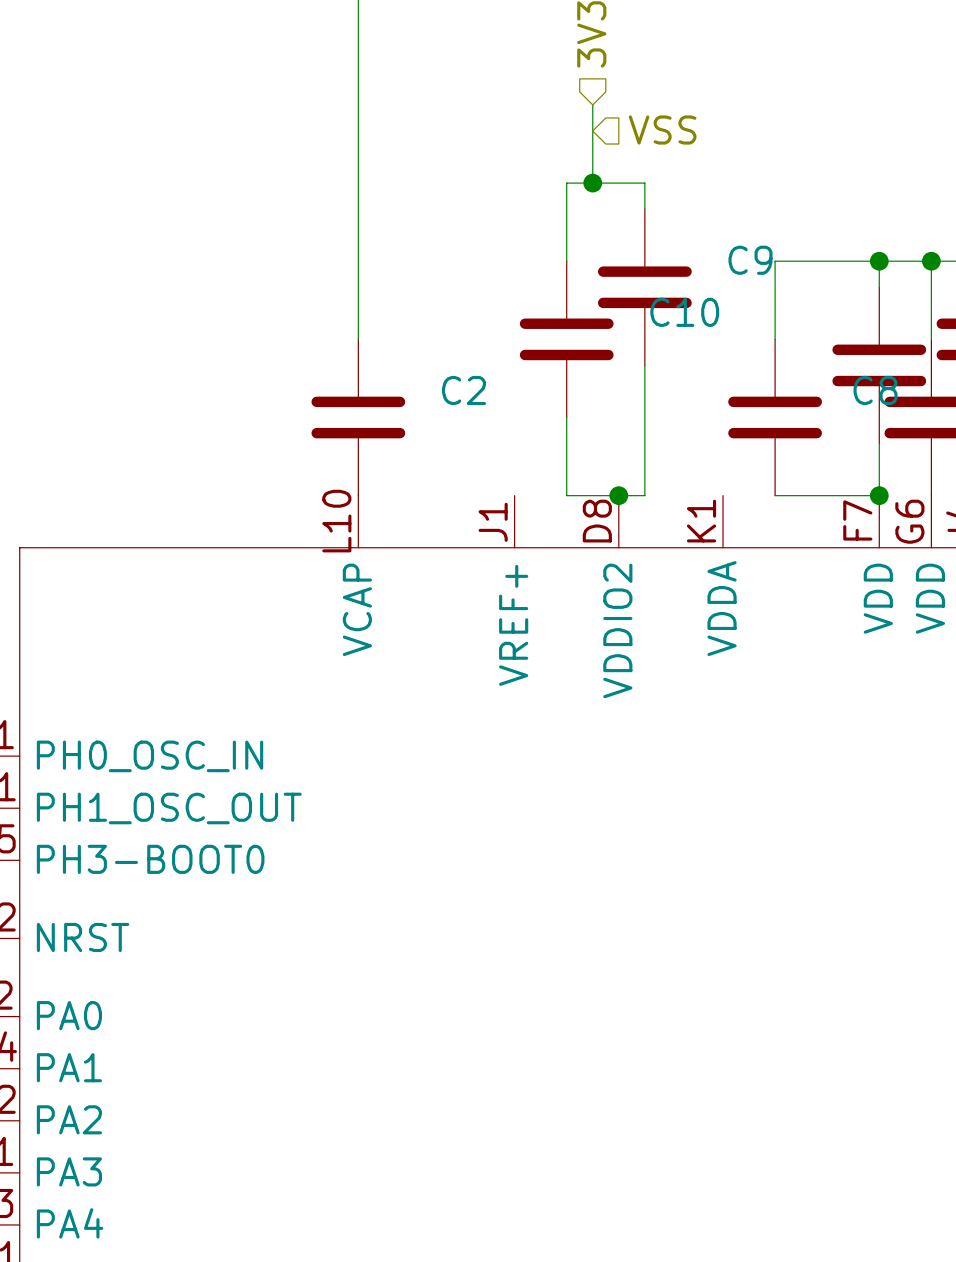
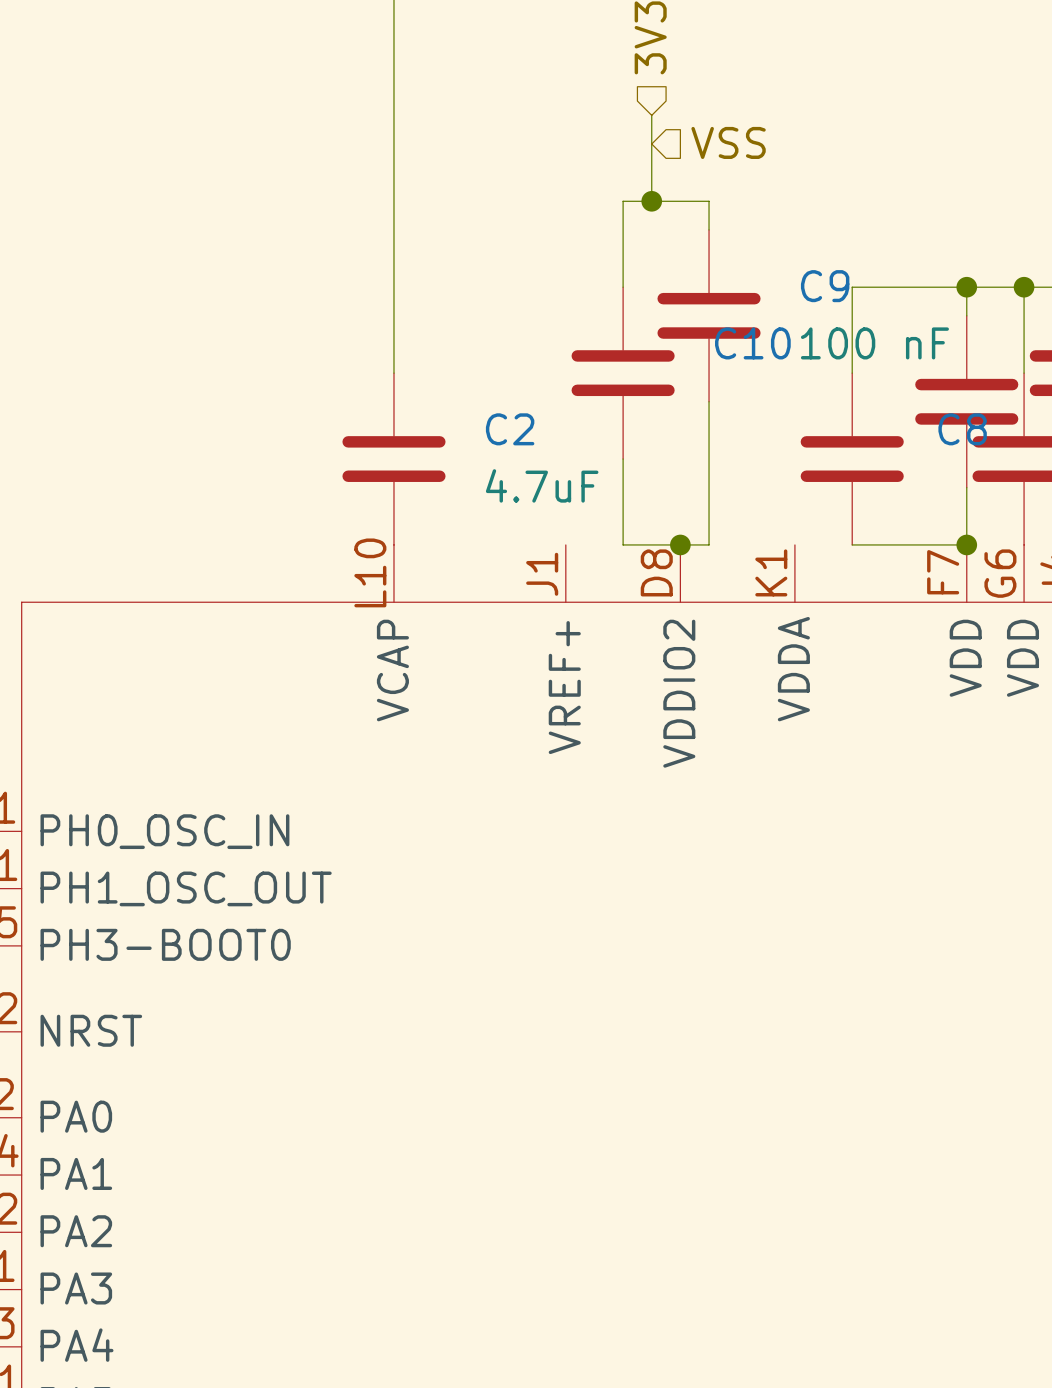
C9 value: none -> 100 nF (874, 343)
C2 value: none -> 4.7uF (542, 485)

